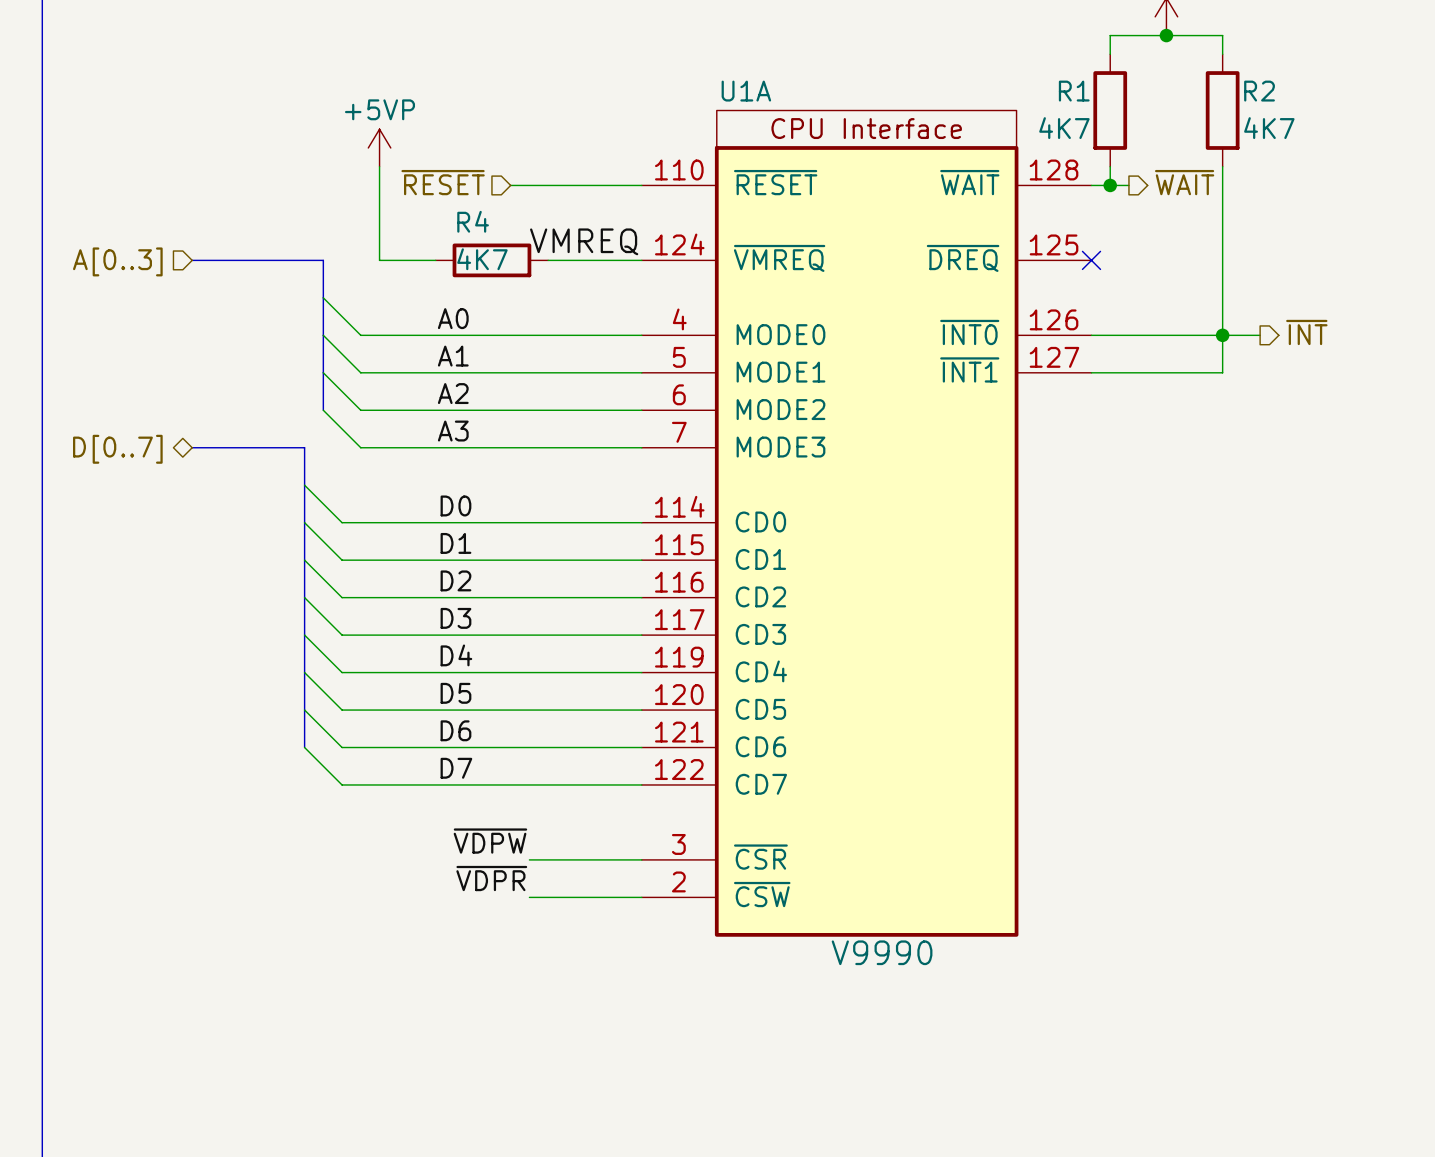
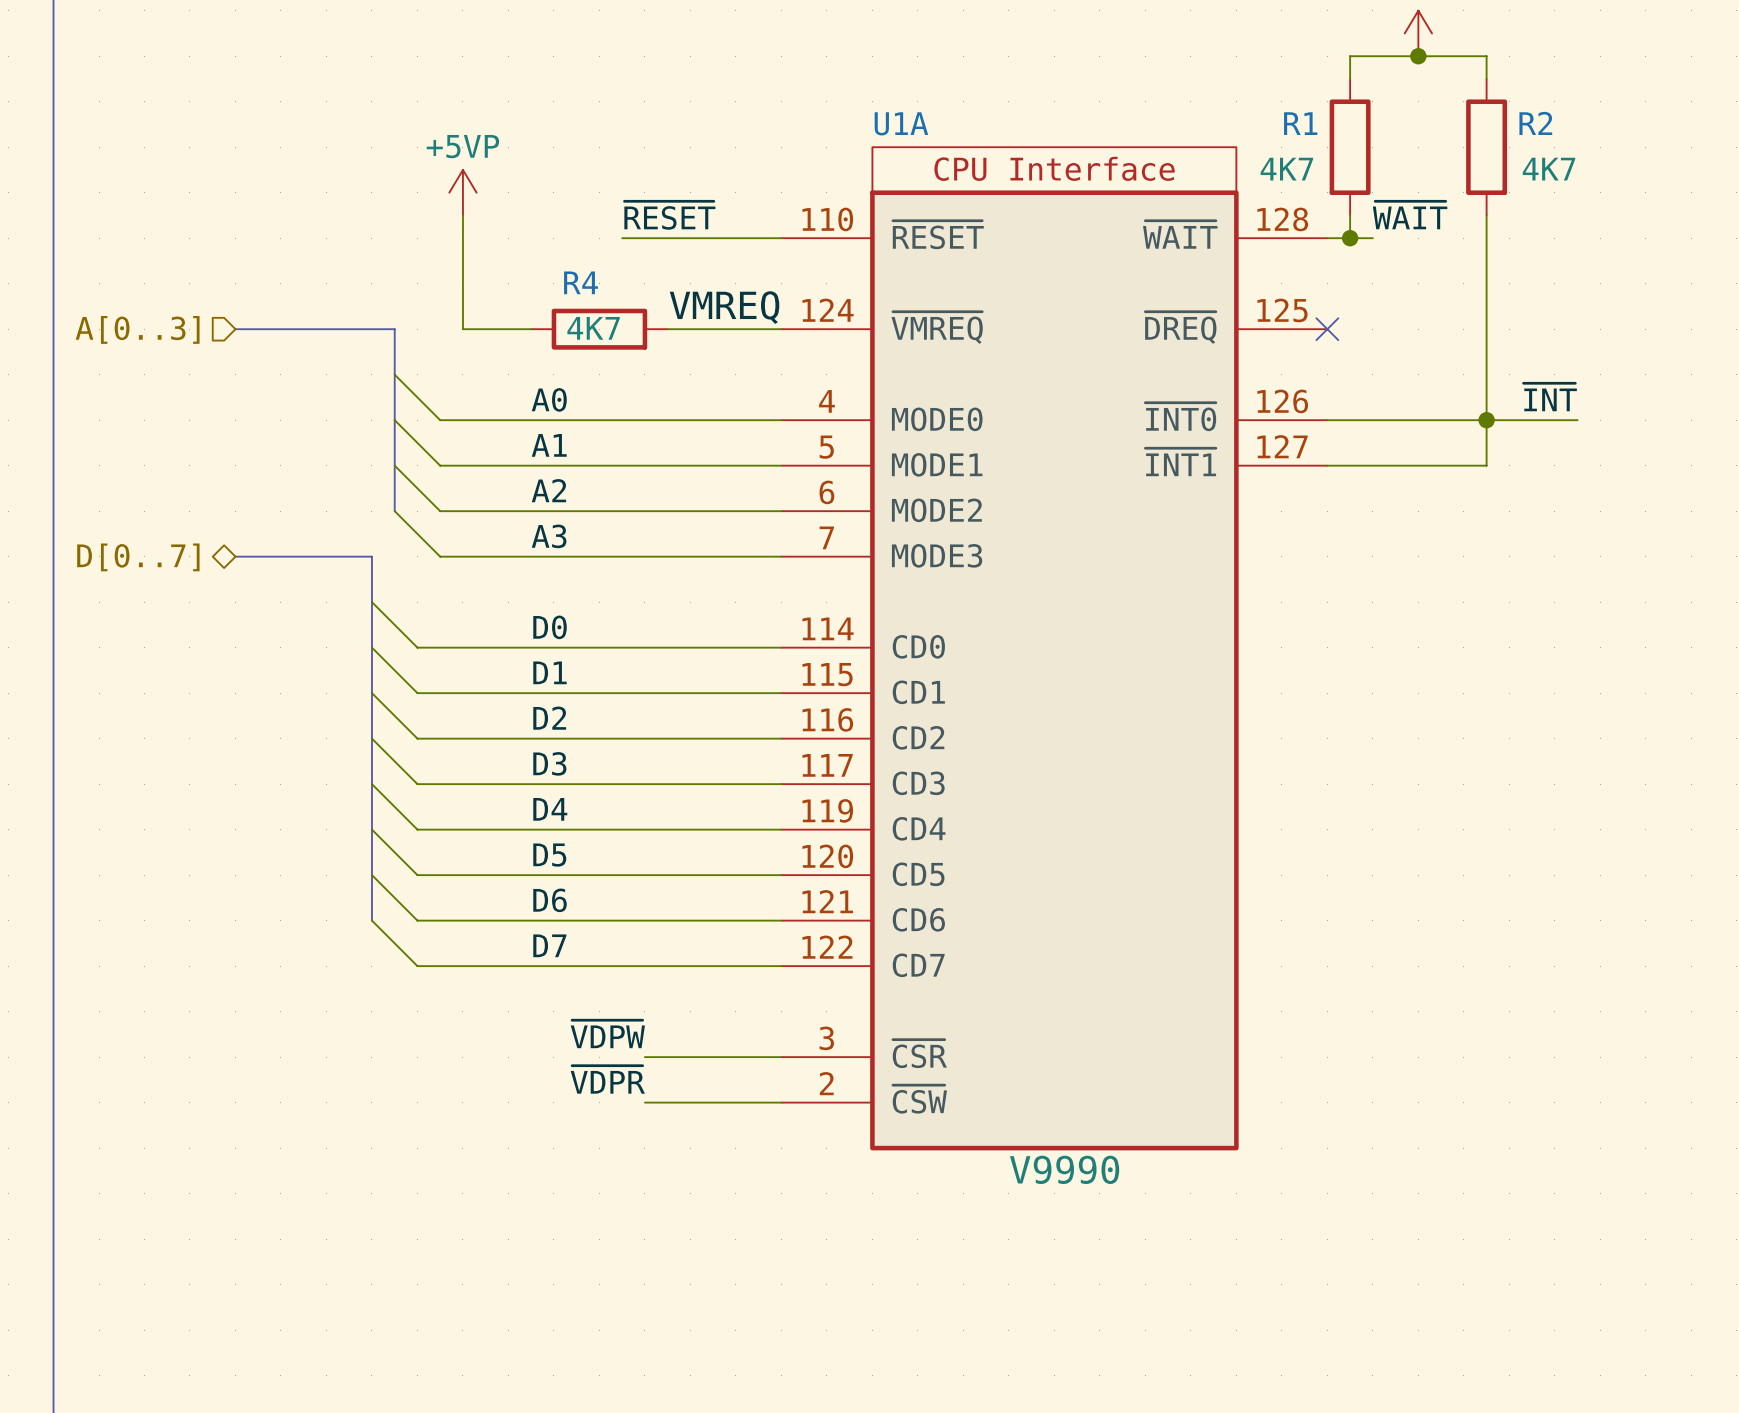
label: none -> ~{RESET} (669, 215)
label: none -> ~{WAIT} (1410, 215)
hierarchical label: ~{RESET} (443, 182) -> none
hierarchical label: ~{WAIT} (1184, 182) -> none
label: none -> ~{INT} (1550, 397)
hierarchical label: ~{INT} (1306, 332) -> none
wire: none -> (1532, 420) (1577, 420)

